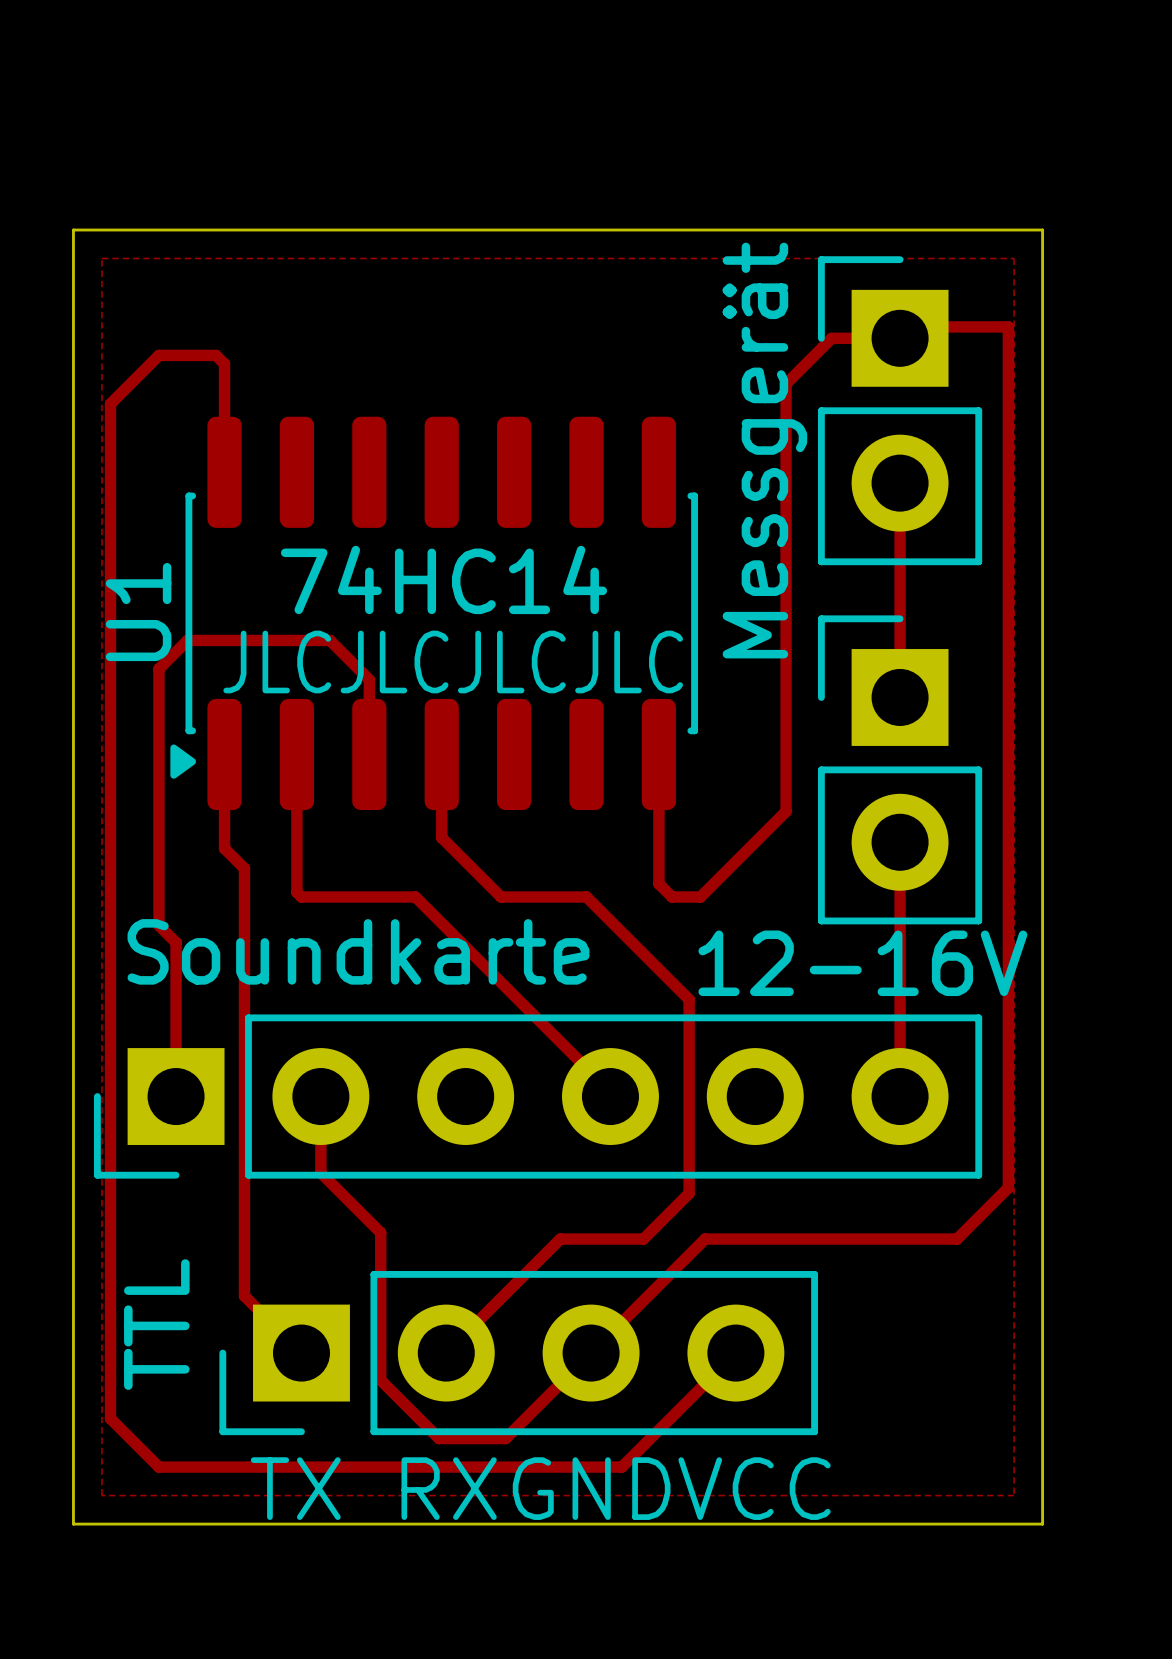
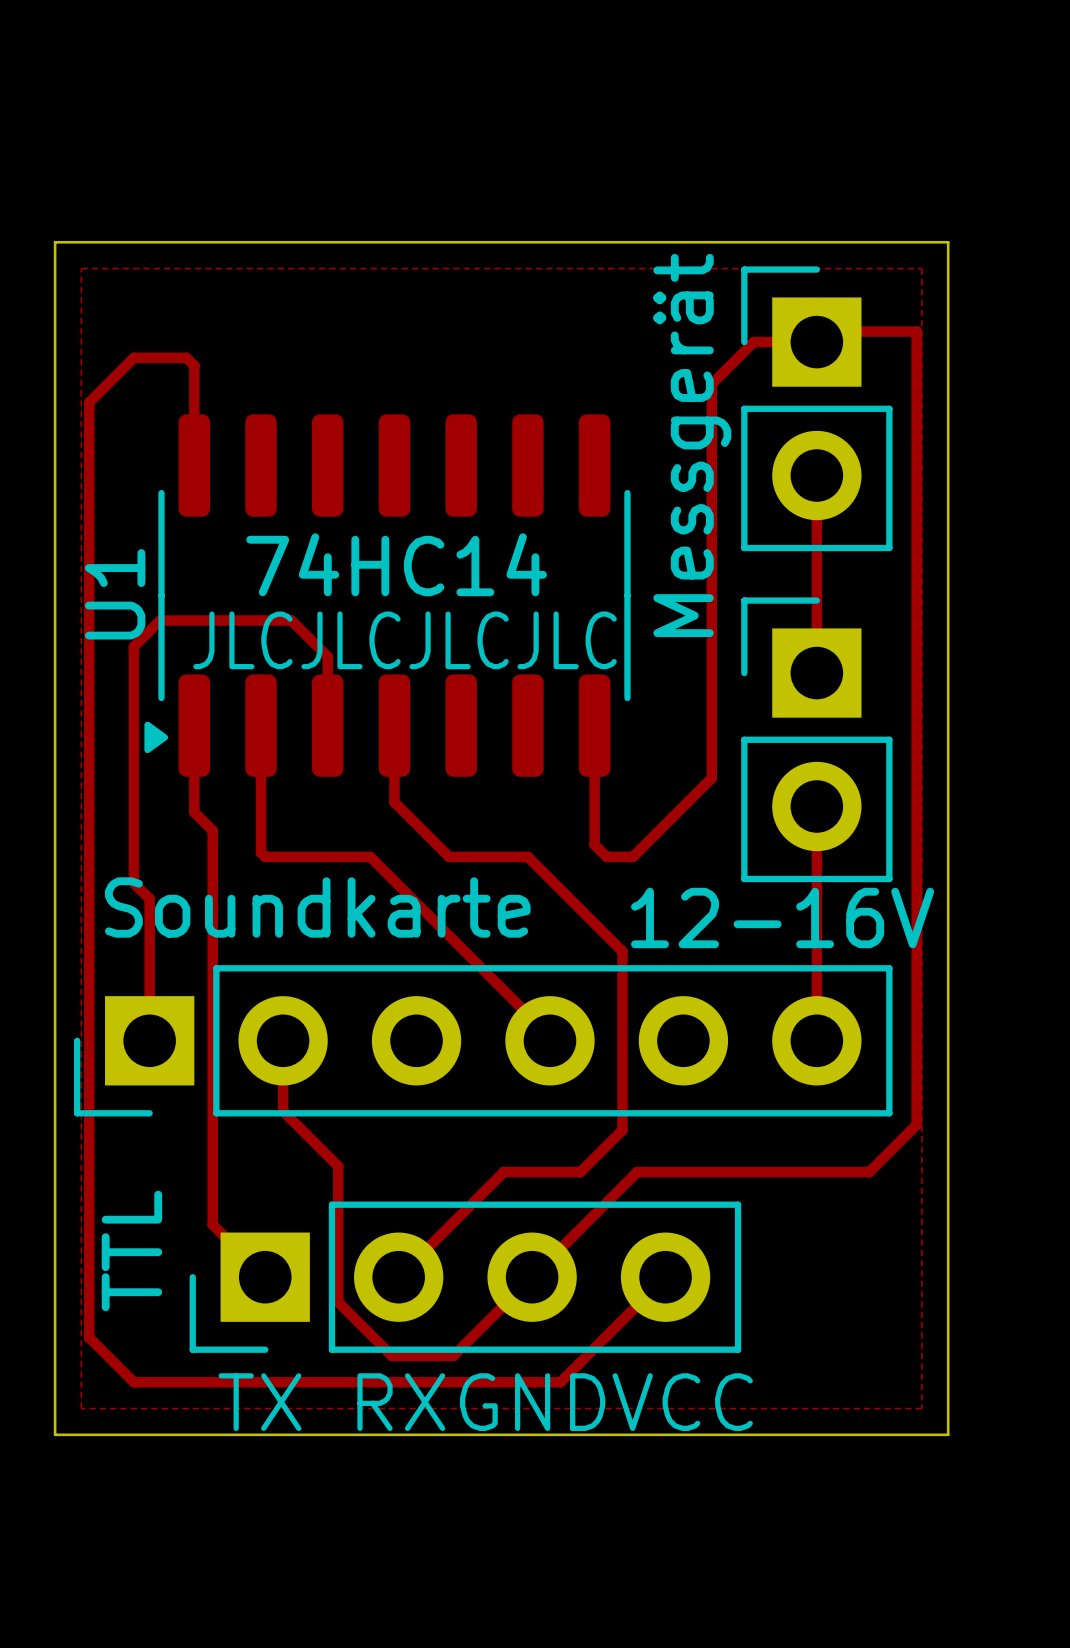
U1 footprint: [170, 416, 698, 811] -> [144, 414, 631, 777]

